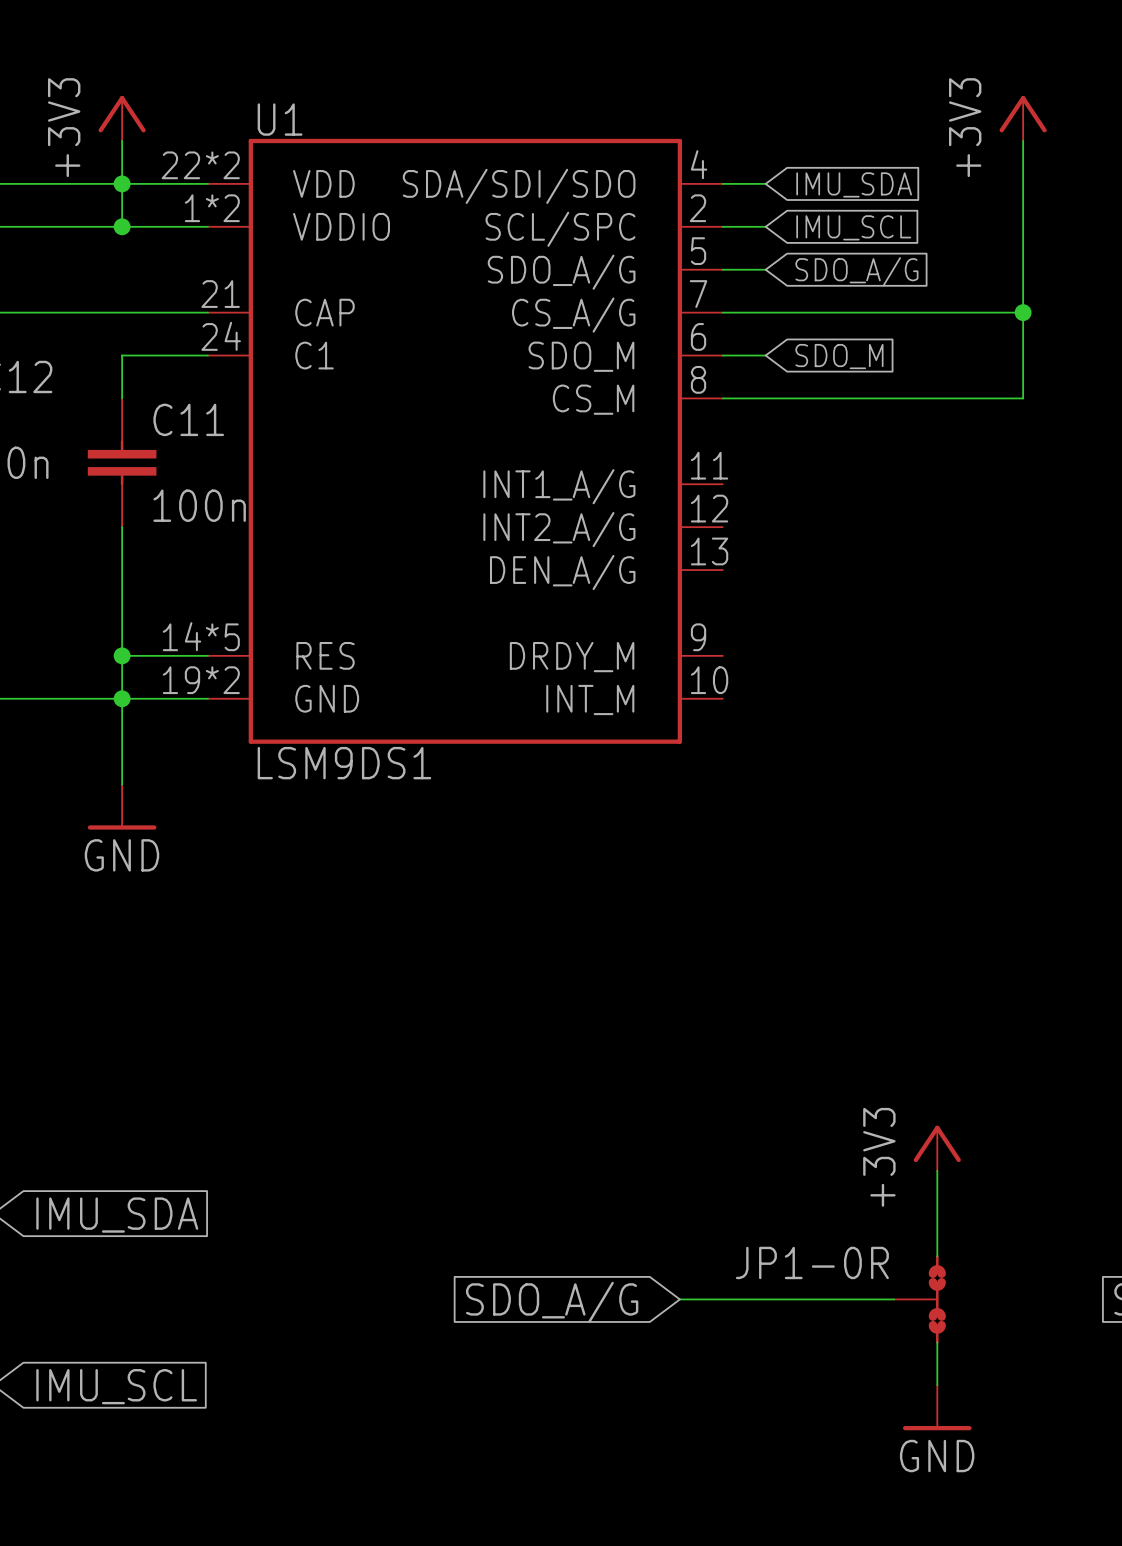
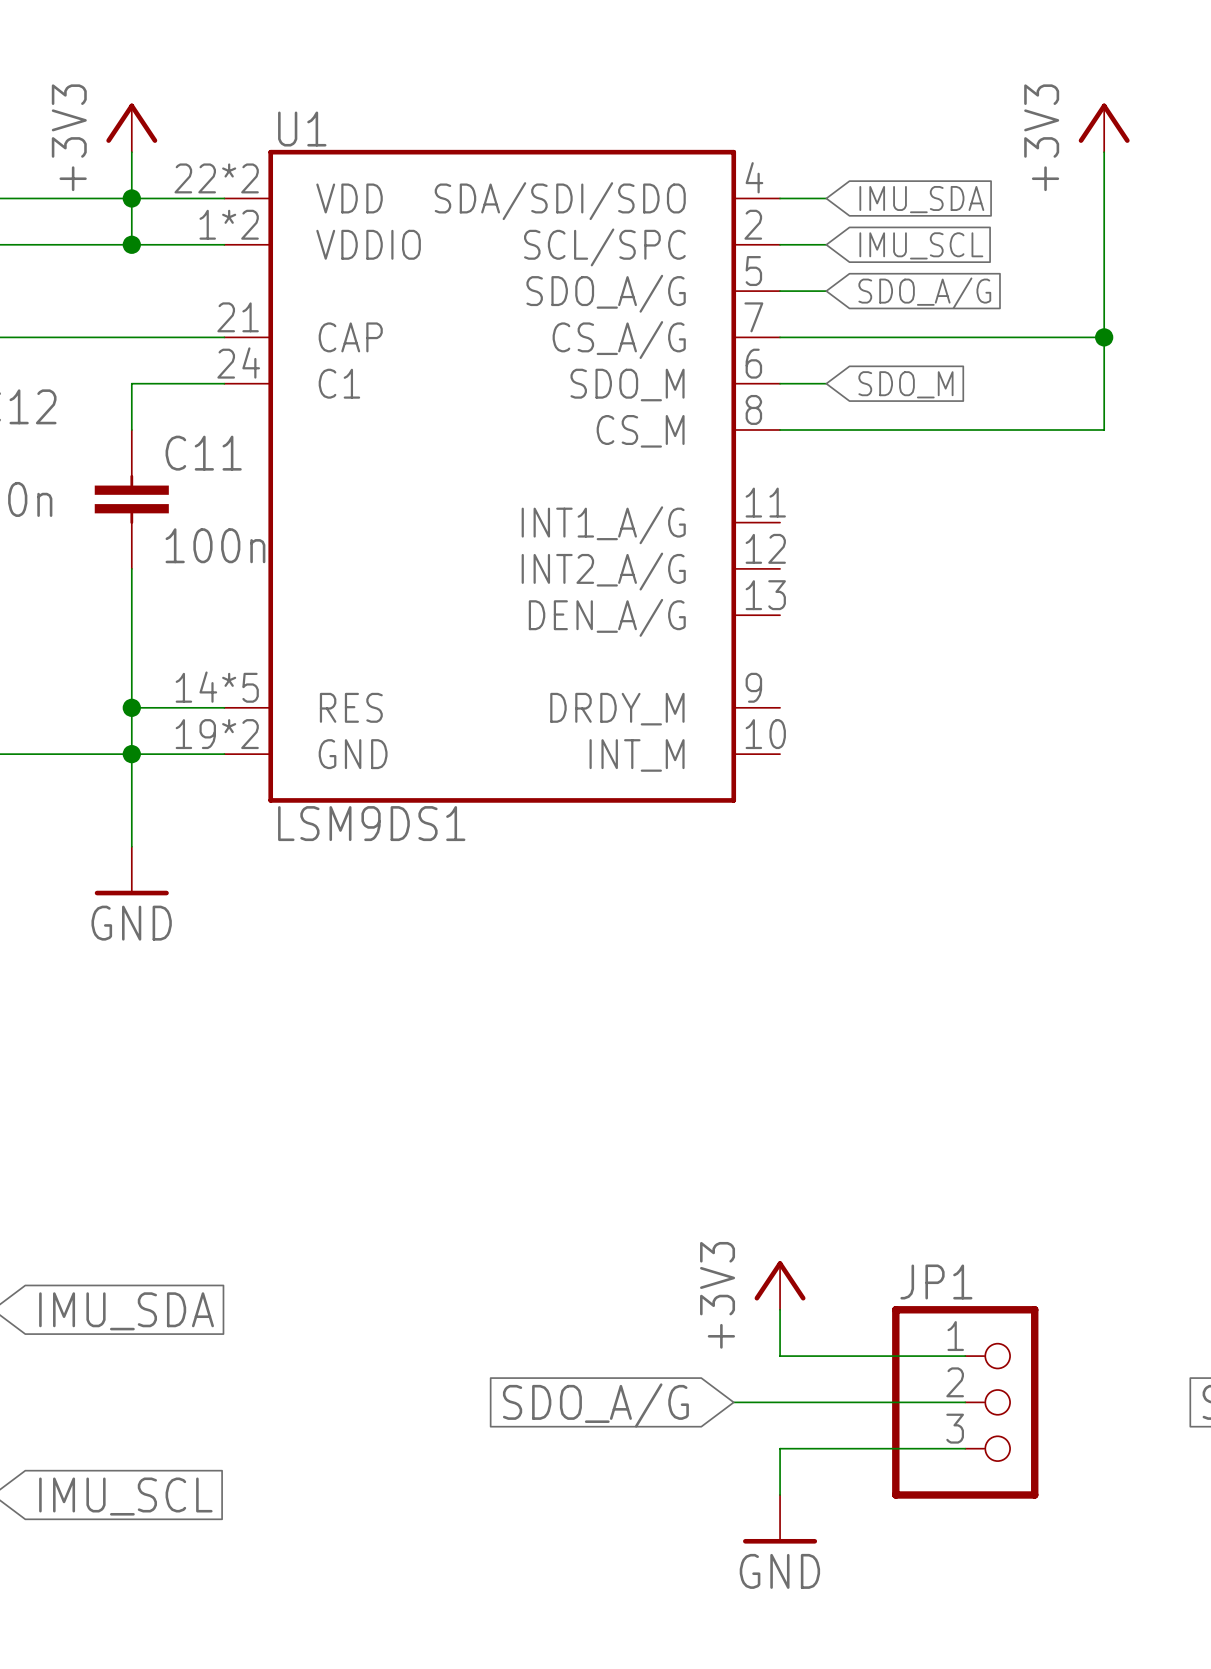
power symbol position: +3V3 (937, 1148) -> +3V3 (780, 1285)
wire: (937, 1170) (937, 1256) -> none
wire: none -> (780, 1309) (780, 1356) (965, 1356)
JP1: none -> (965, 1402)
JP1-0R: (920, 1299) -> none
wire: none -> (965, 1448) (780, 1448) (780, 1494)
wire: (937, 1342) (937, 1385) -> none
power symbol position: GND (937, 1407) -> GND (780, 1519)

